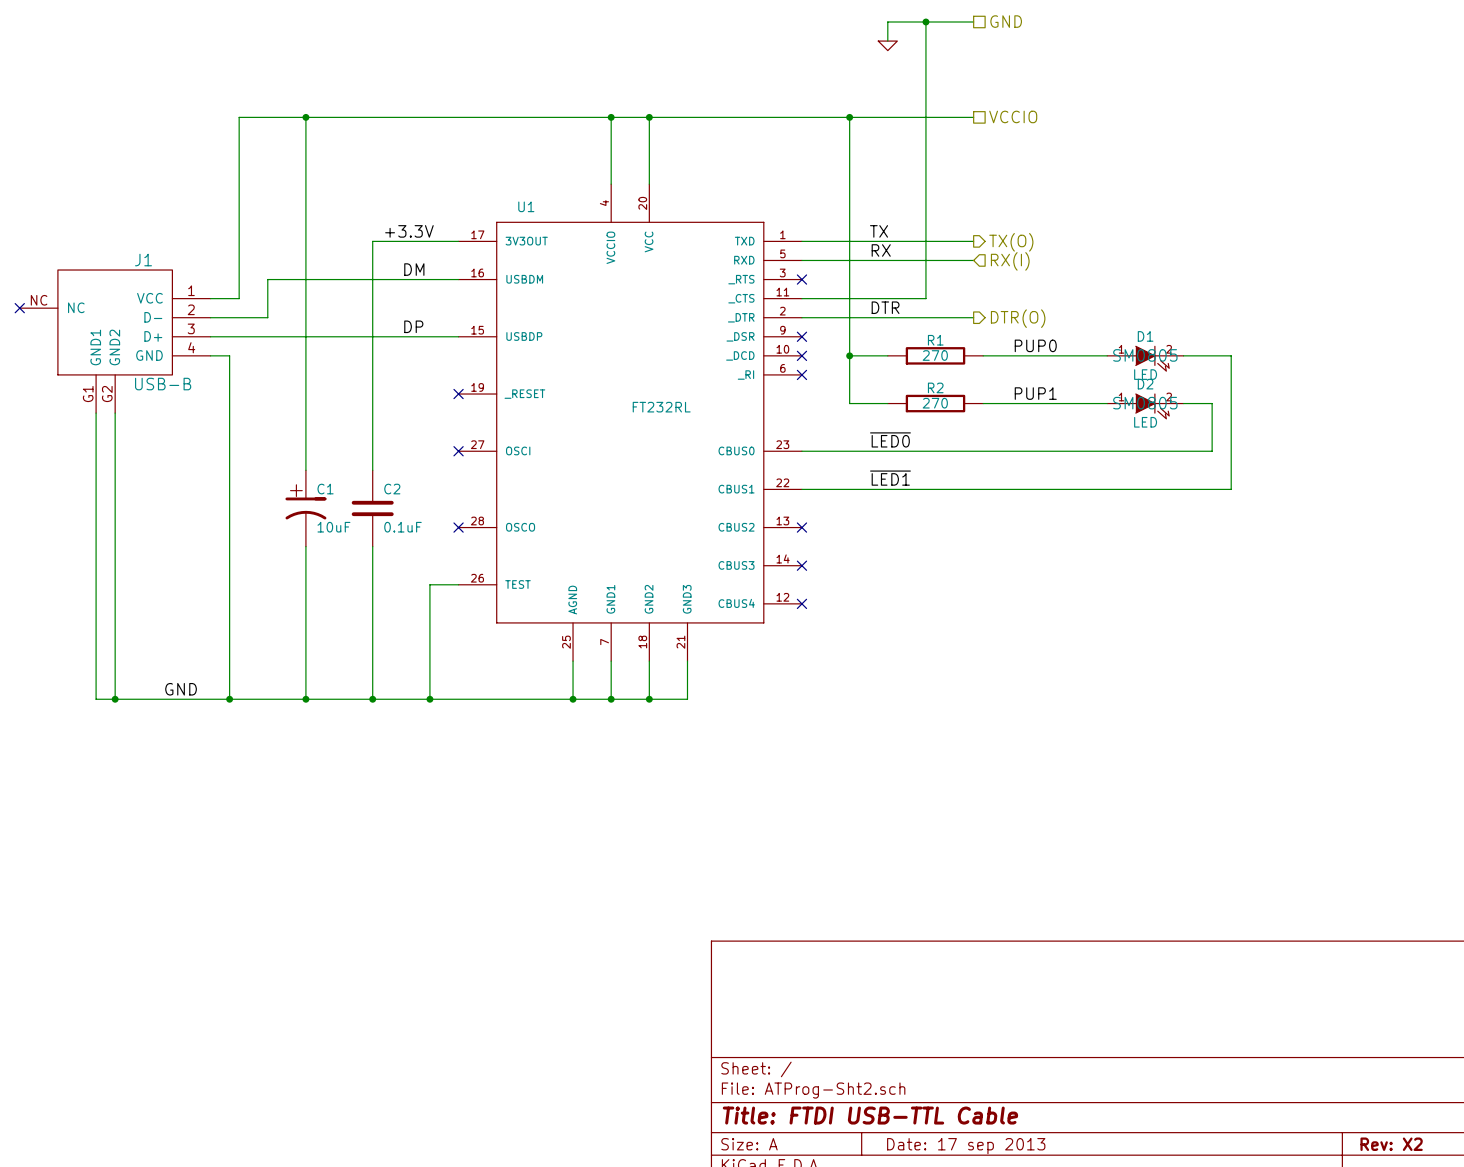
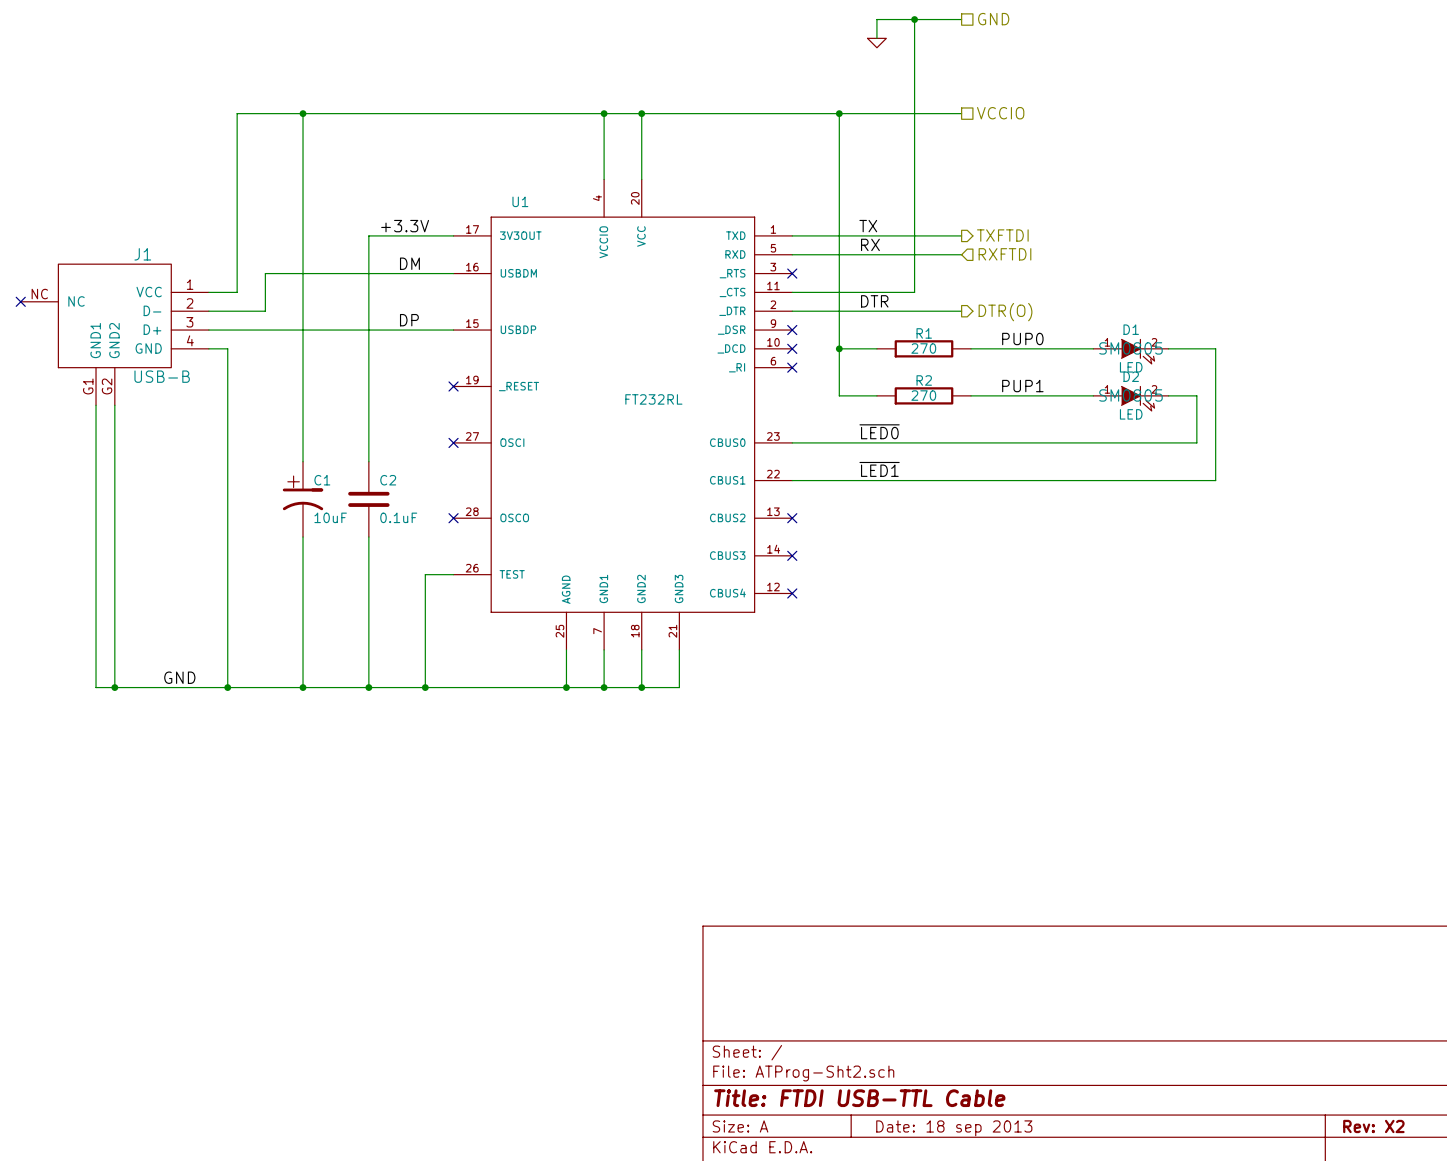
hierarchical label: TX(O) (1011, 242) -> TXFTDI (1002, 235)
hierarchical label: RX(I) (1010, 261) -> RXFTDI (1004, 254)
title block: Date: 17 sep 2013 (966, 1146) -> Date: 18 sep 2013 (954, 1128)

